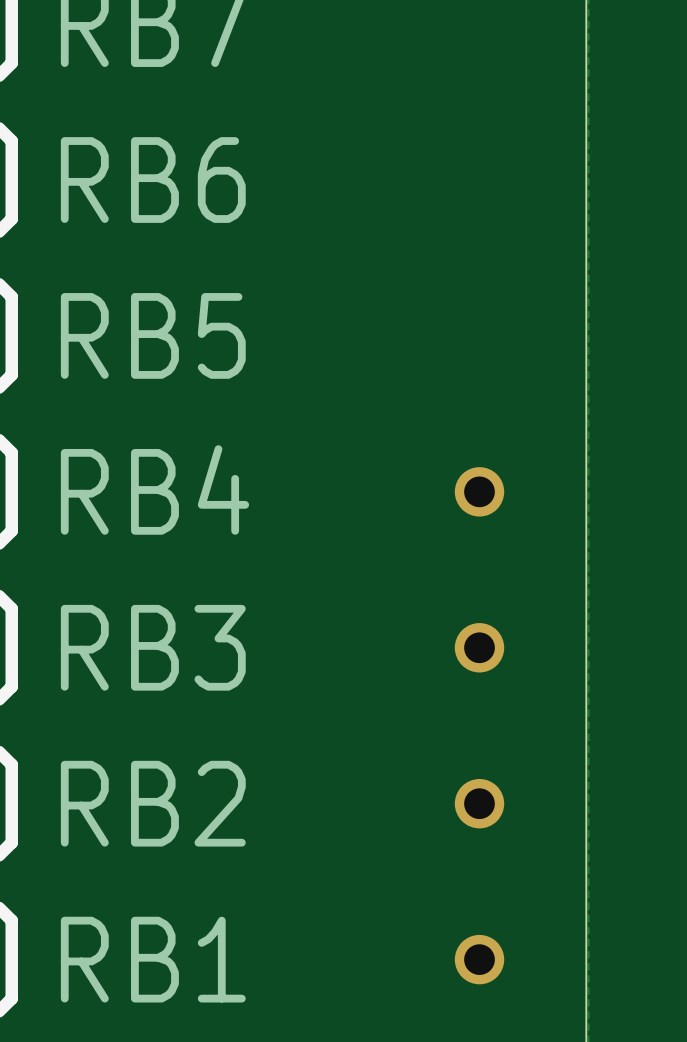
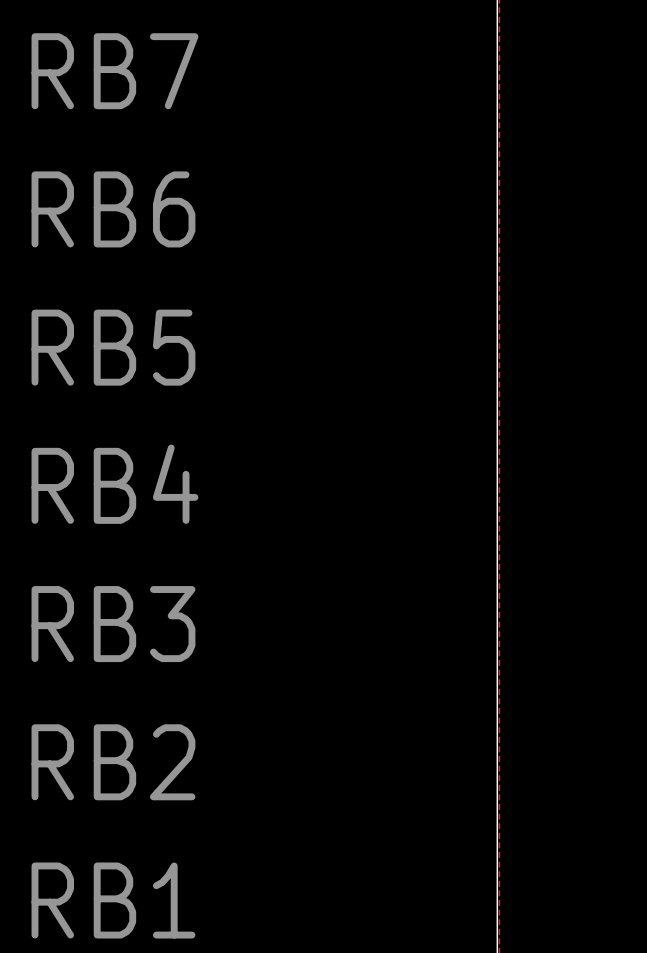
via: (479, 491) -> none
via: (479, 647) -> none
via: (479, 803) -> none
via: (479, 959) -> none

